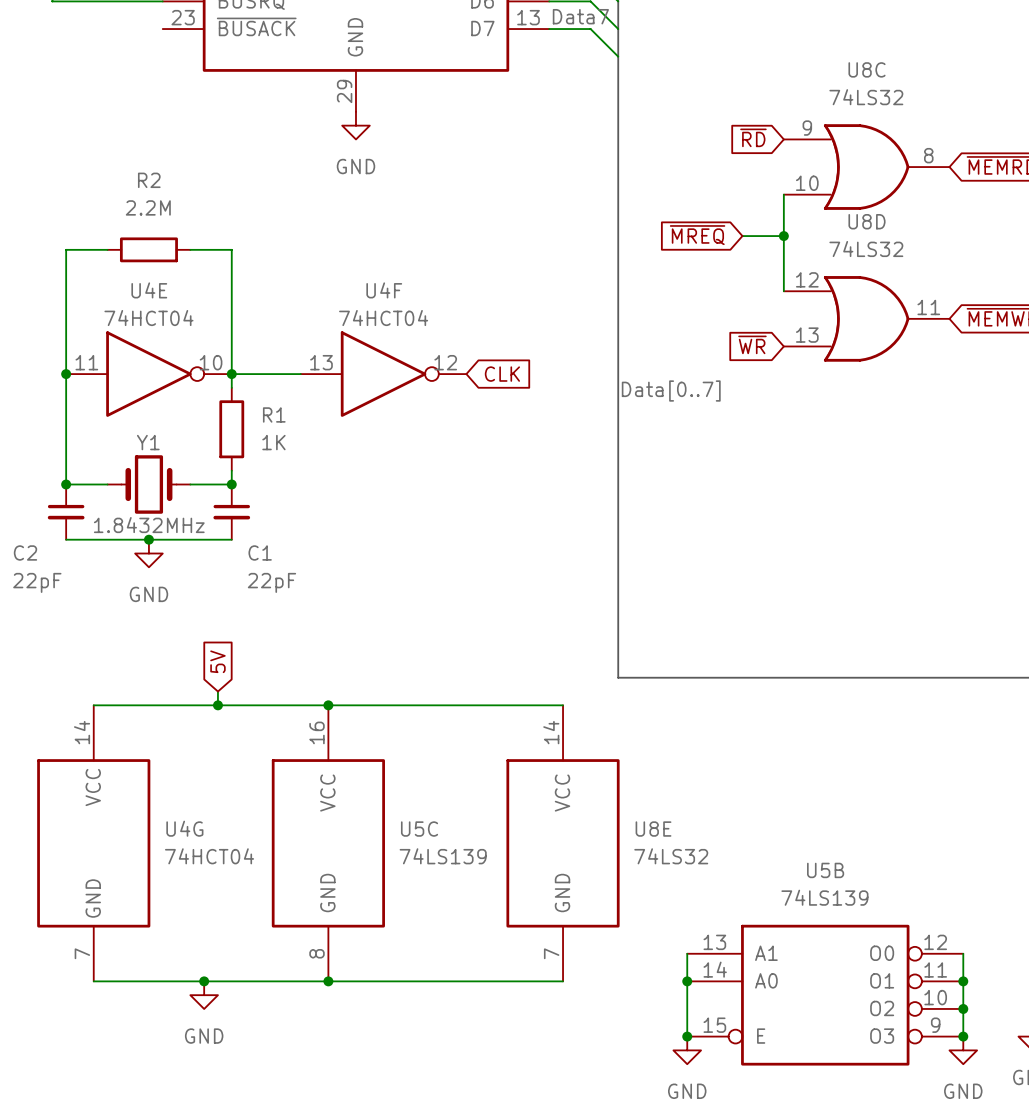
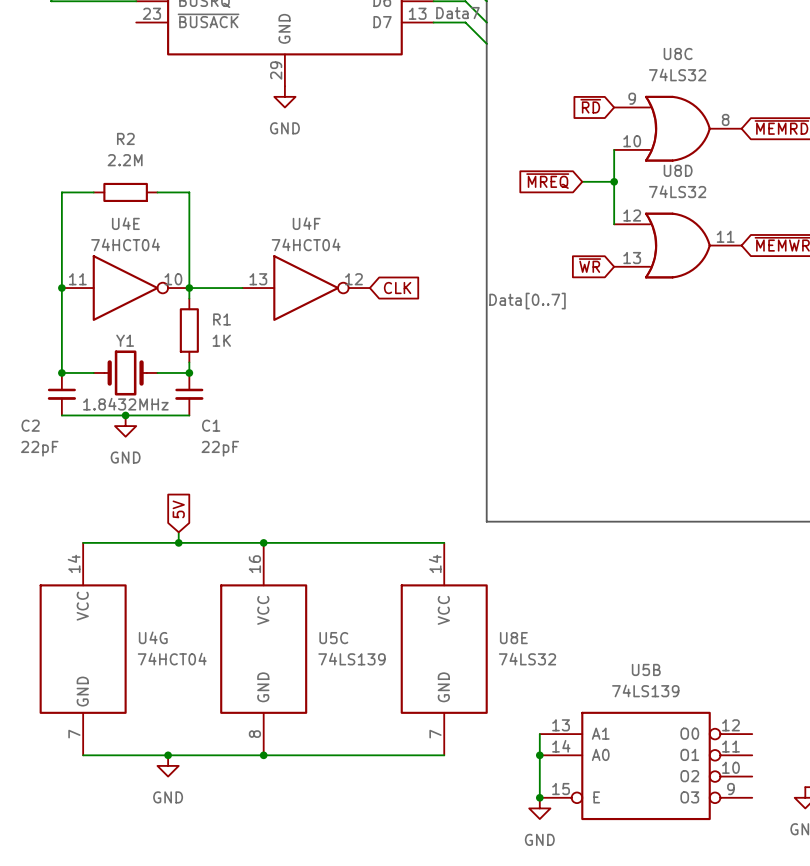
wire: (963, 953) (963, 1036) -> none
junction: (963, 981) -> none
junction: (963, 1008) -> none
junction: (963, 1036) -> none
power symbol: GND (963, 1050) -> none

